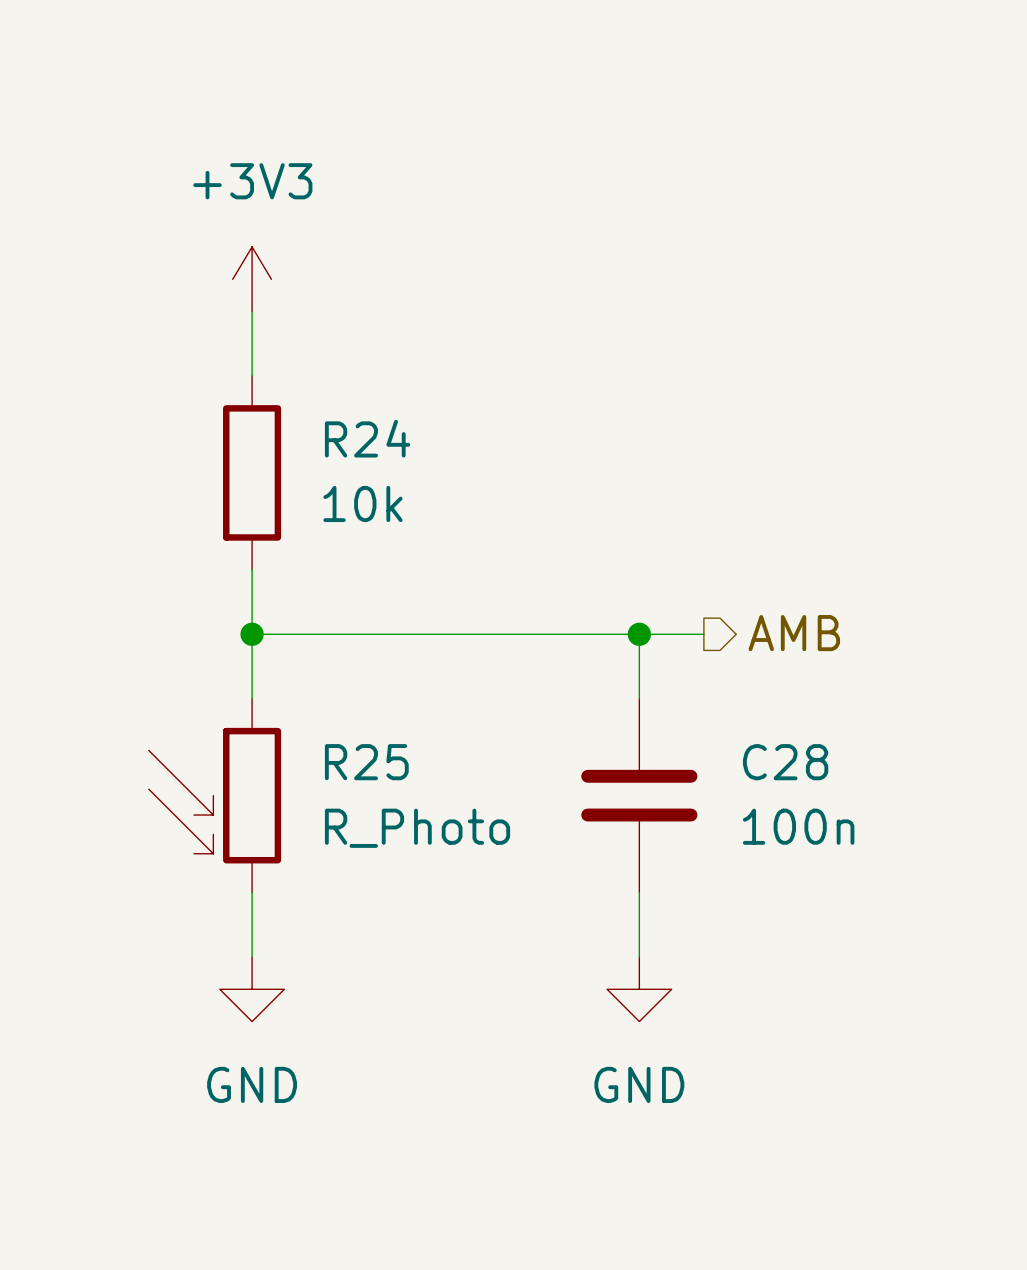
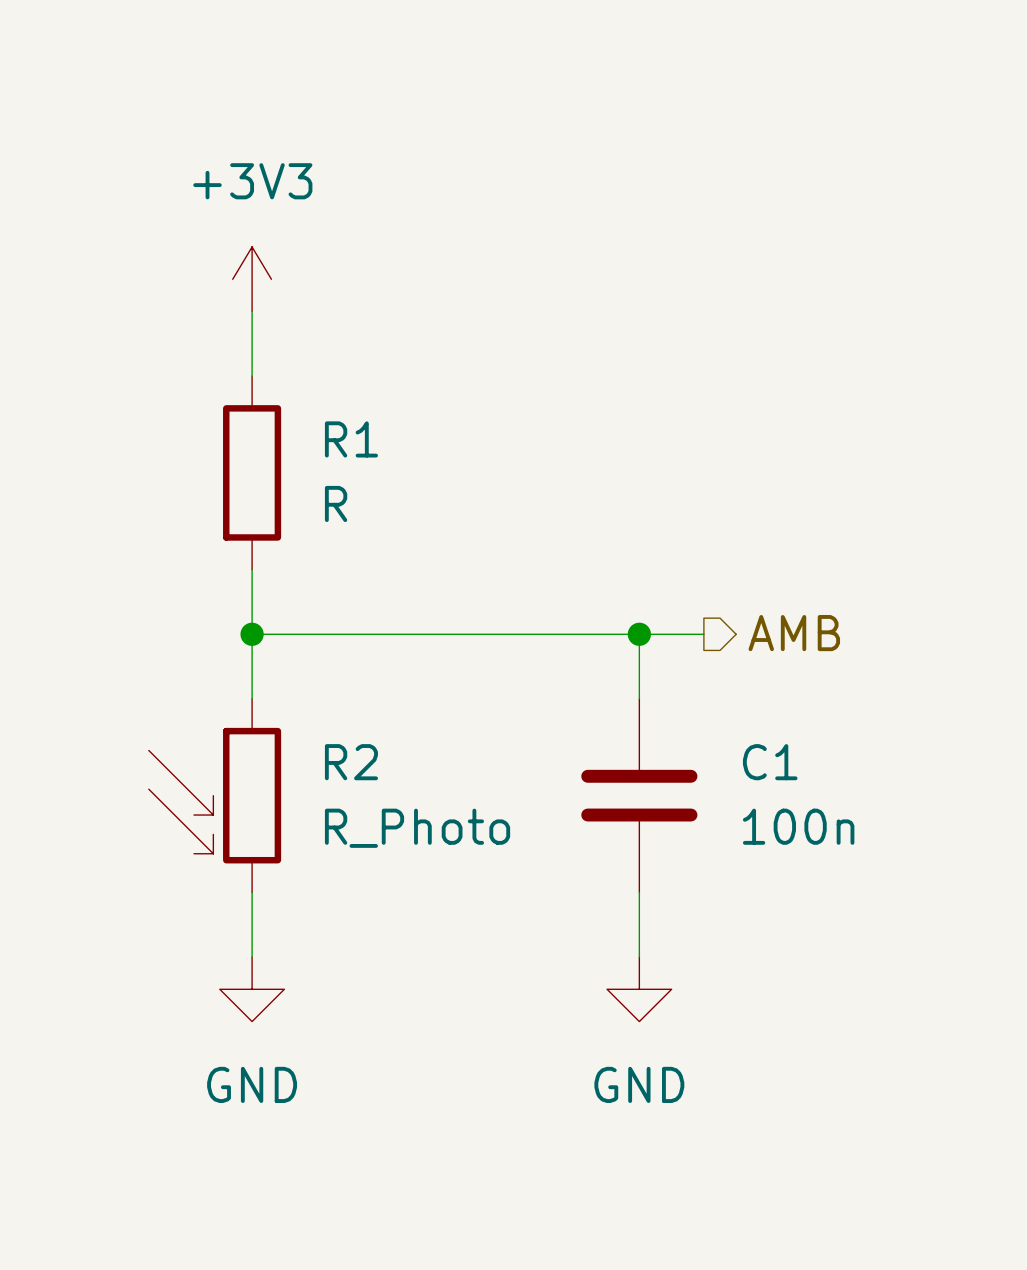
R24 name: R24 (367, 438) -> R1 (351, 439)
R24 value: 10k (362, 503) -> R (336, 503)
R25 name: R25 (366, 762) -> R2 (351, 762)
C28 name: C28 (785, 762) -> C1 (770, 762)

